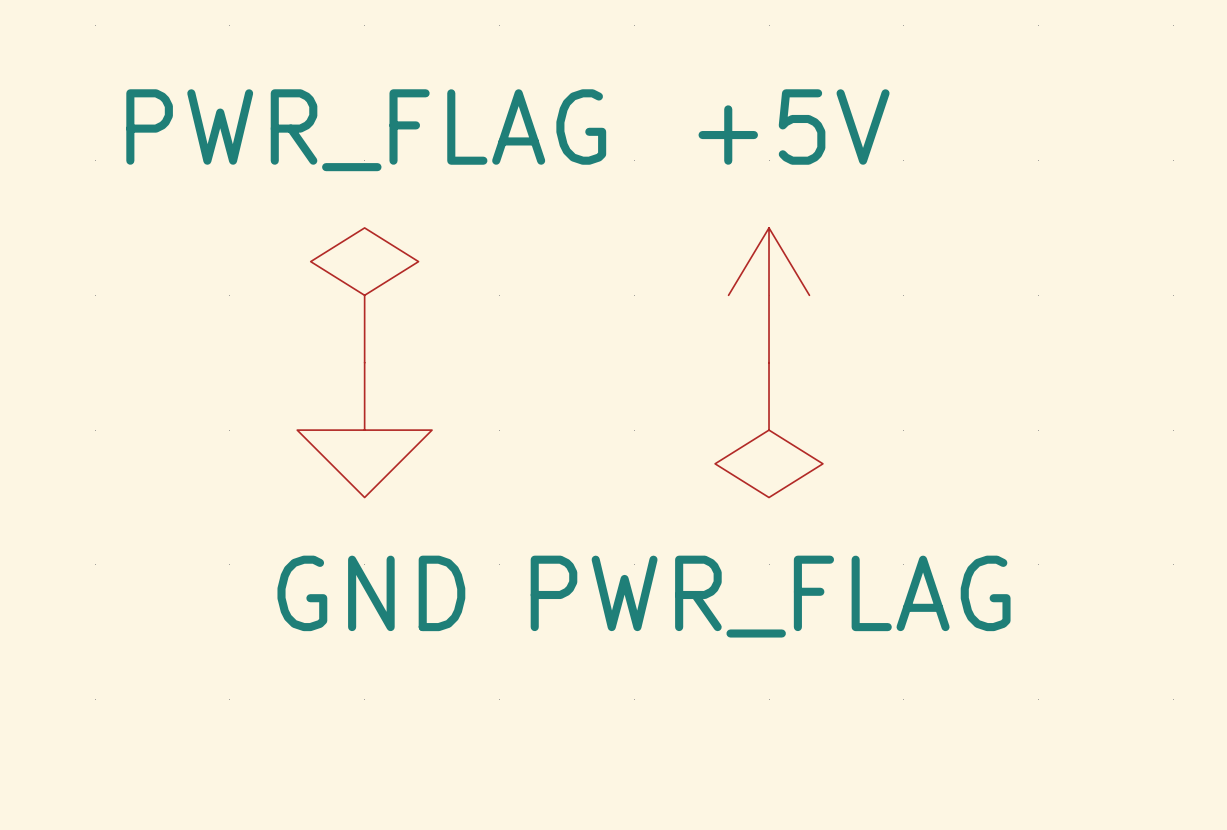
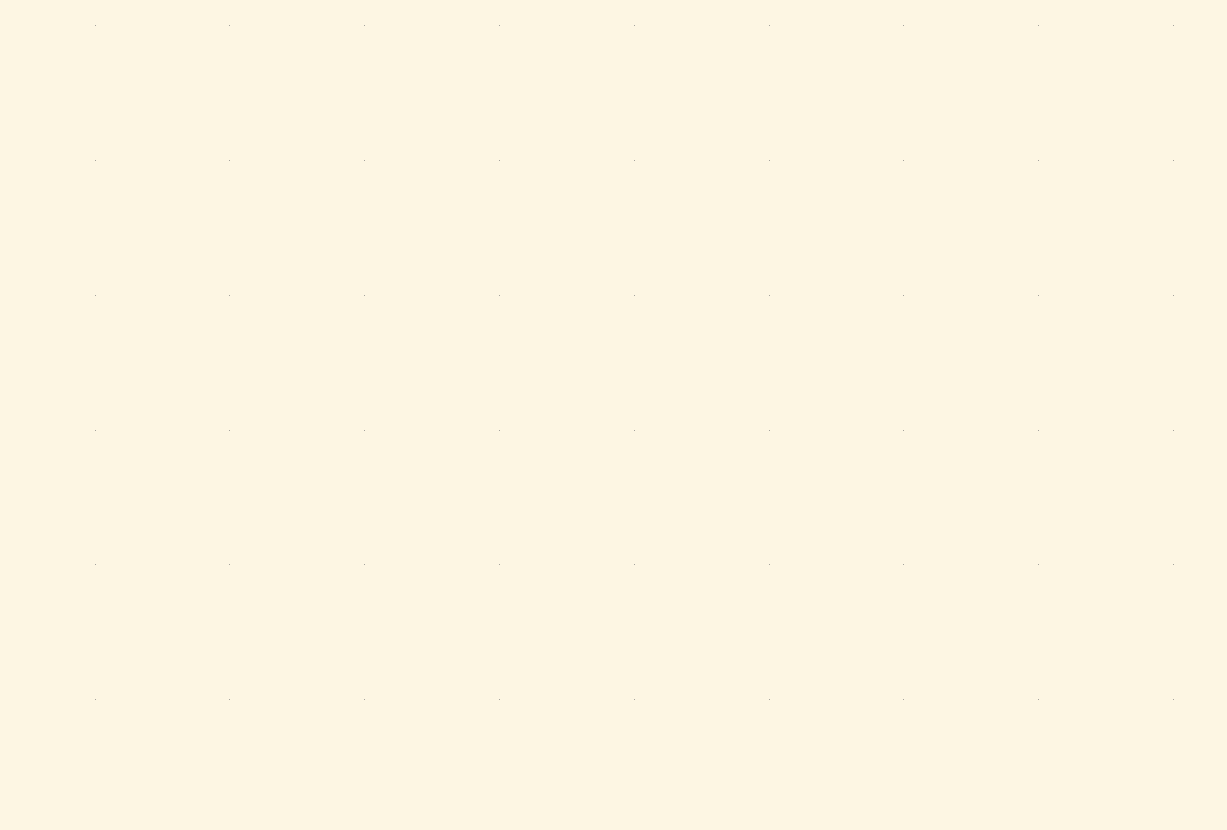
power symbol: PWR_FLAG (364, 295) -> none
power symbol: +5V (769, 295) -> none
power symbol: GND (364, 430) -> none
power symbol: PWR_FLAG (769, 430) -> none

